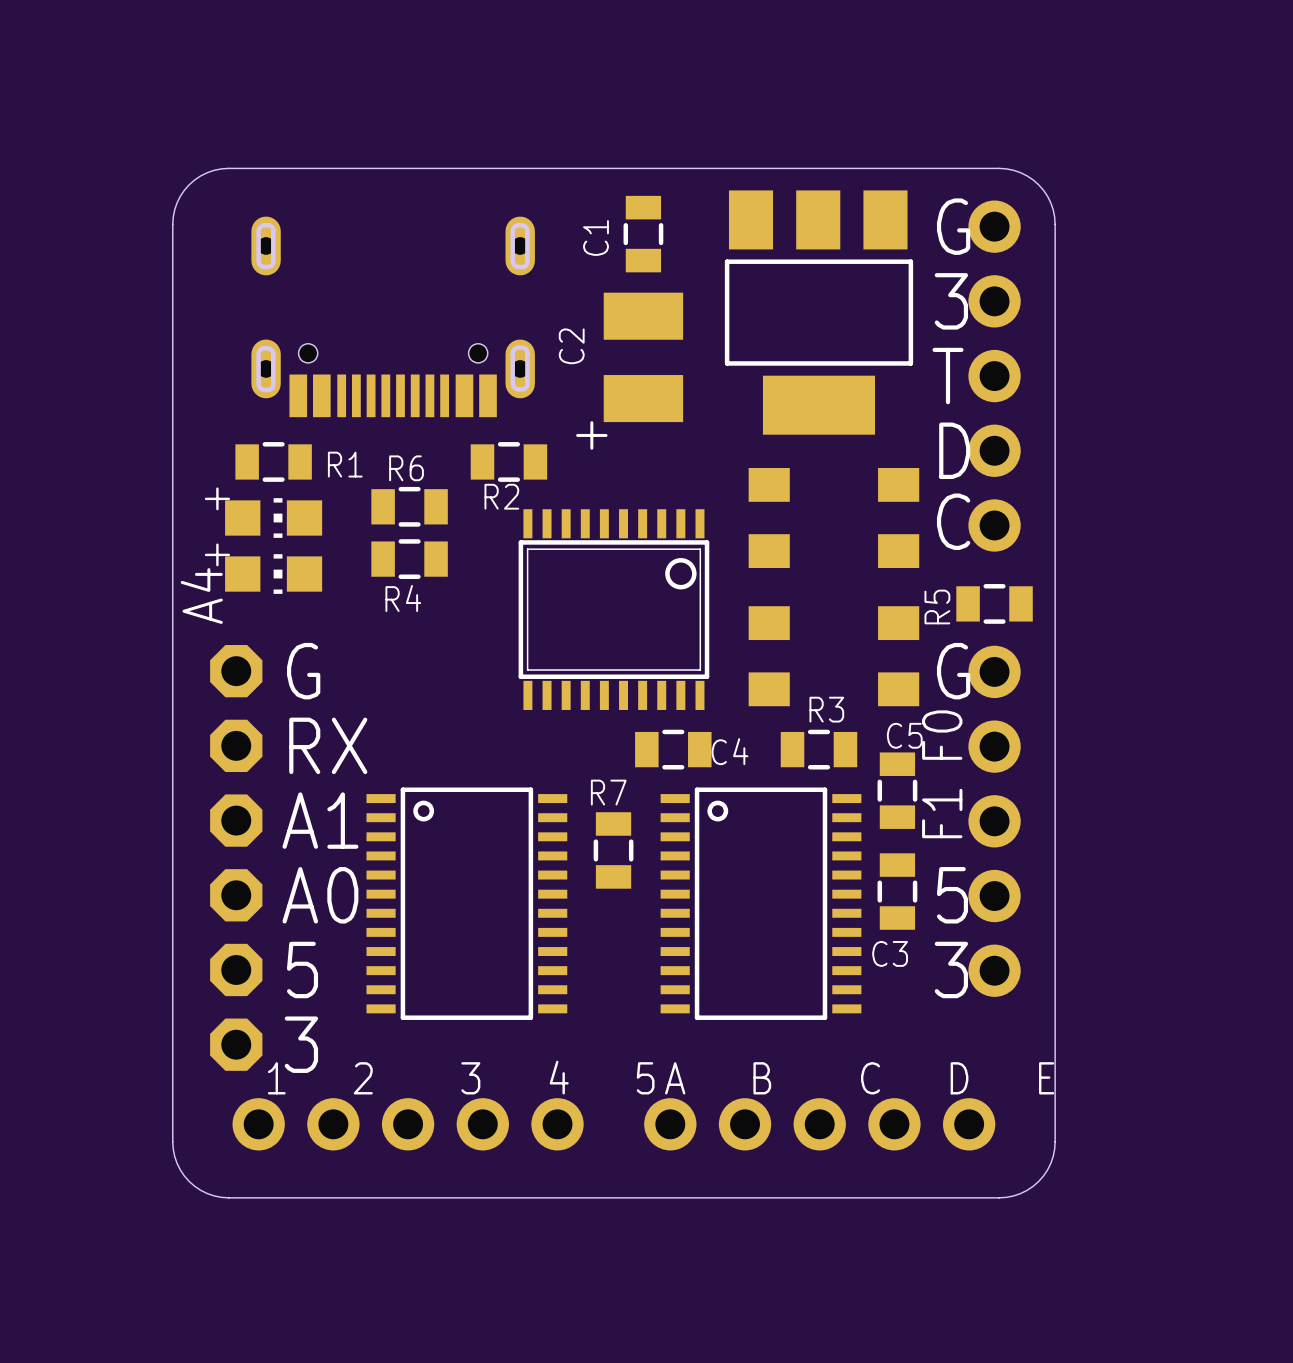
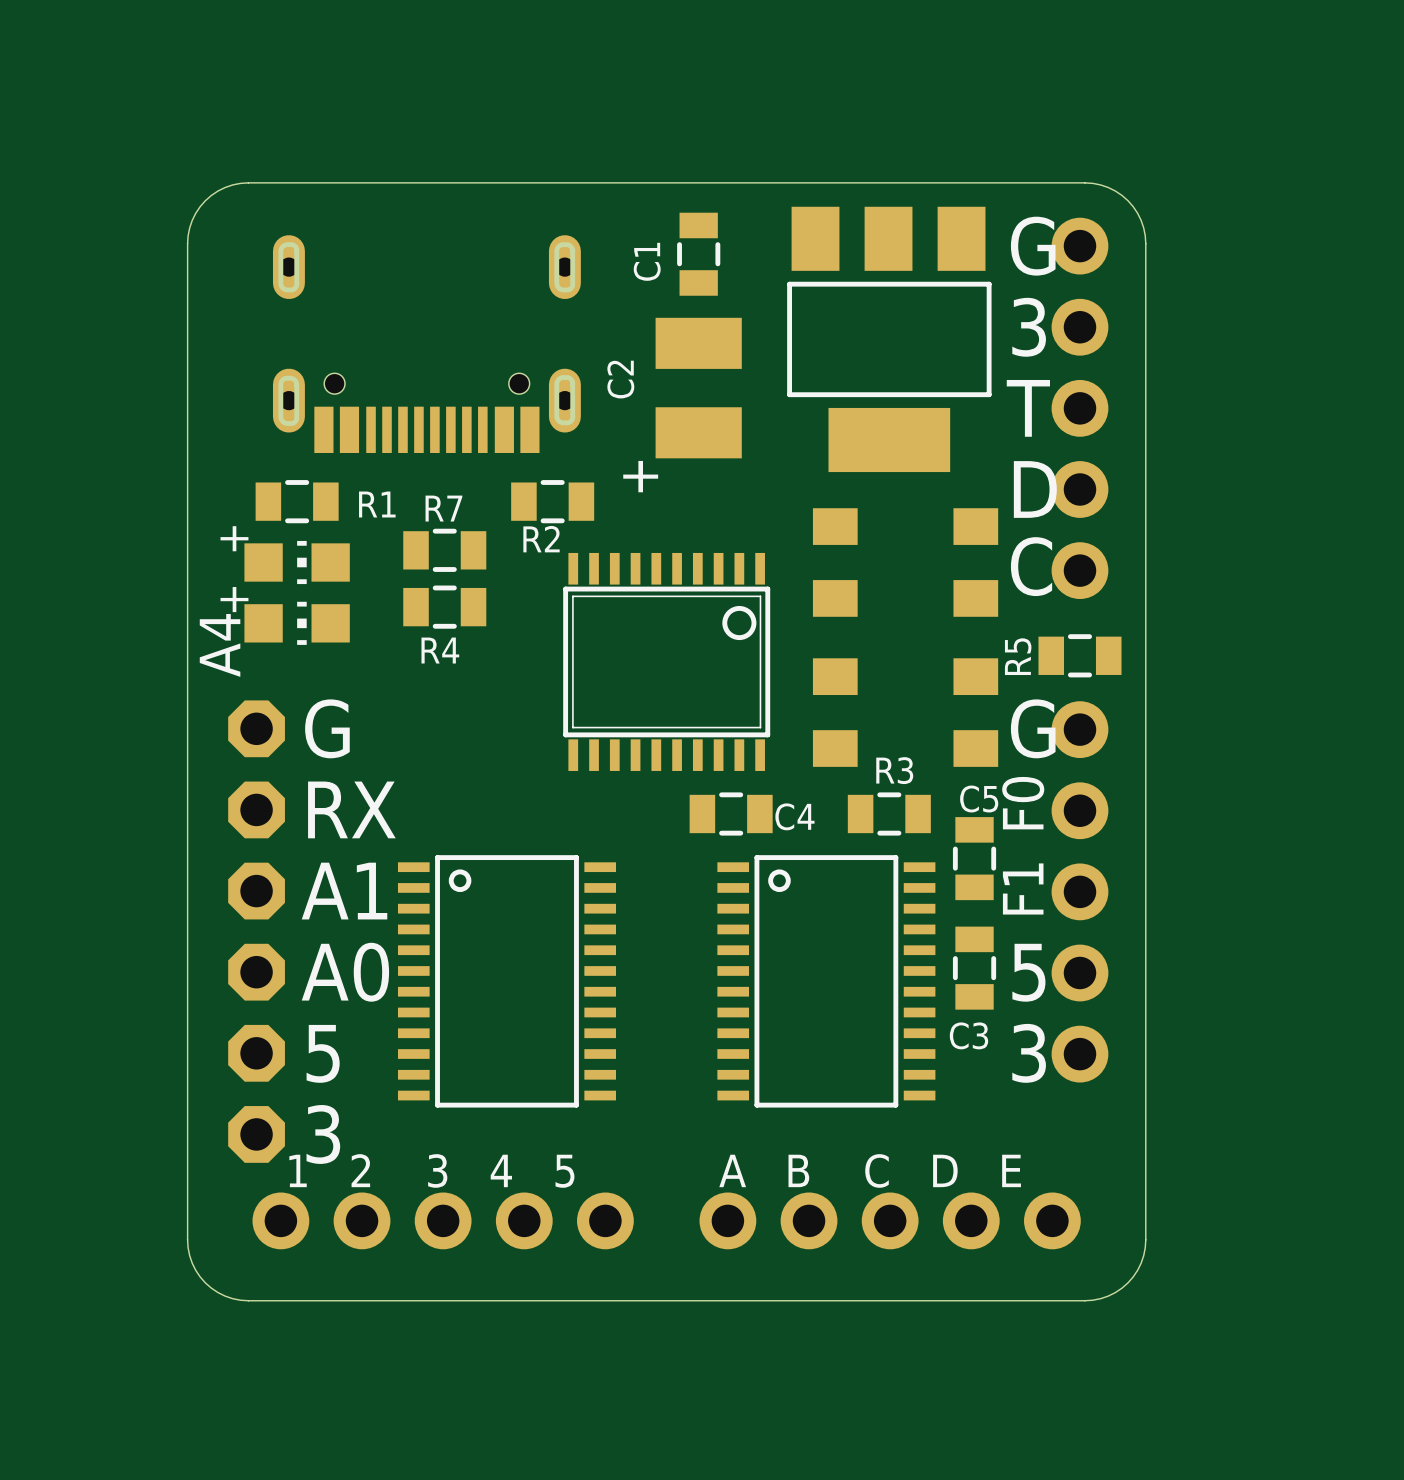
R6 name: R6 (406, 468) -> R7 (443, 508)
R7: (613, 850) -> none

